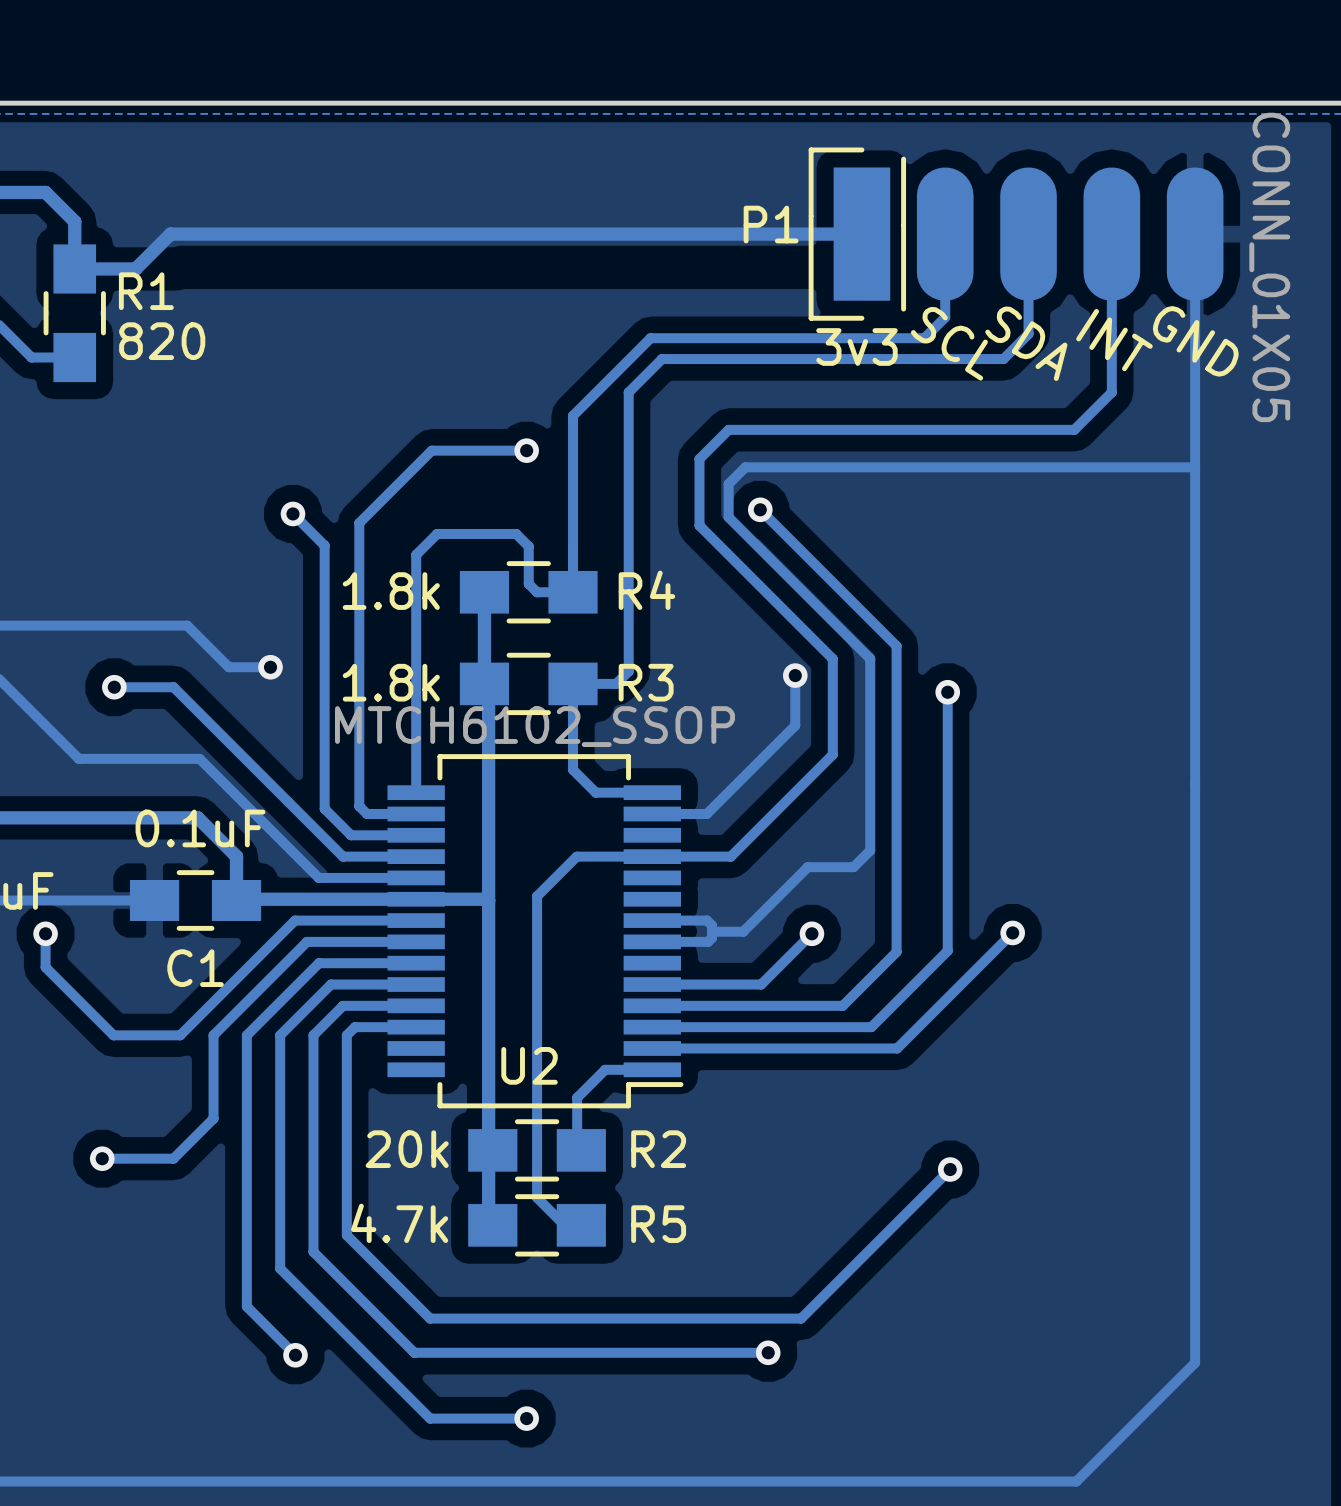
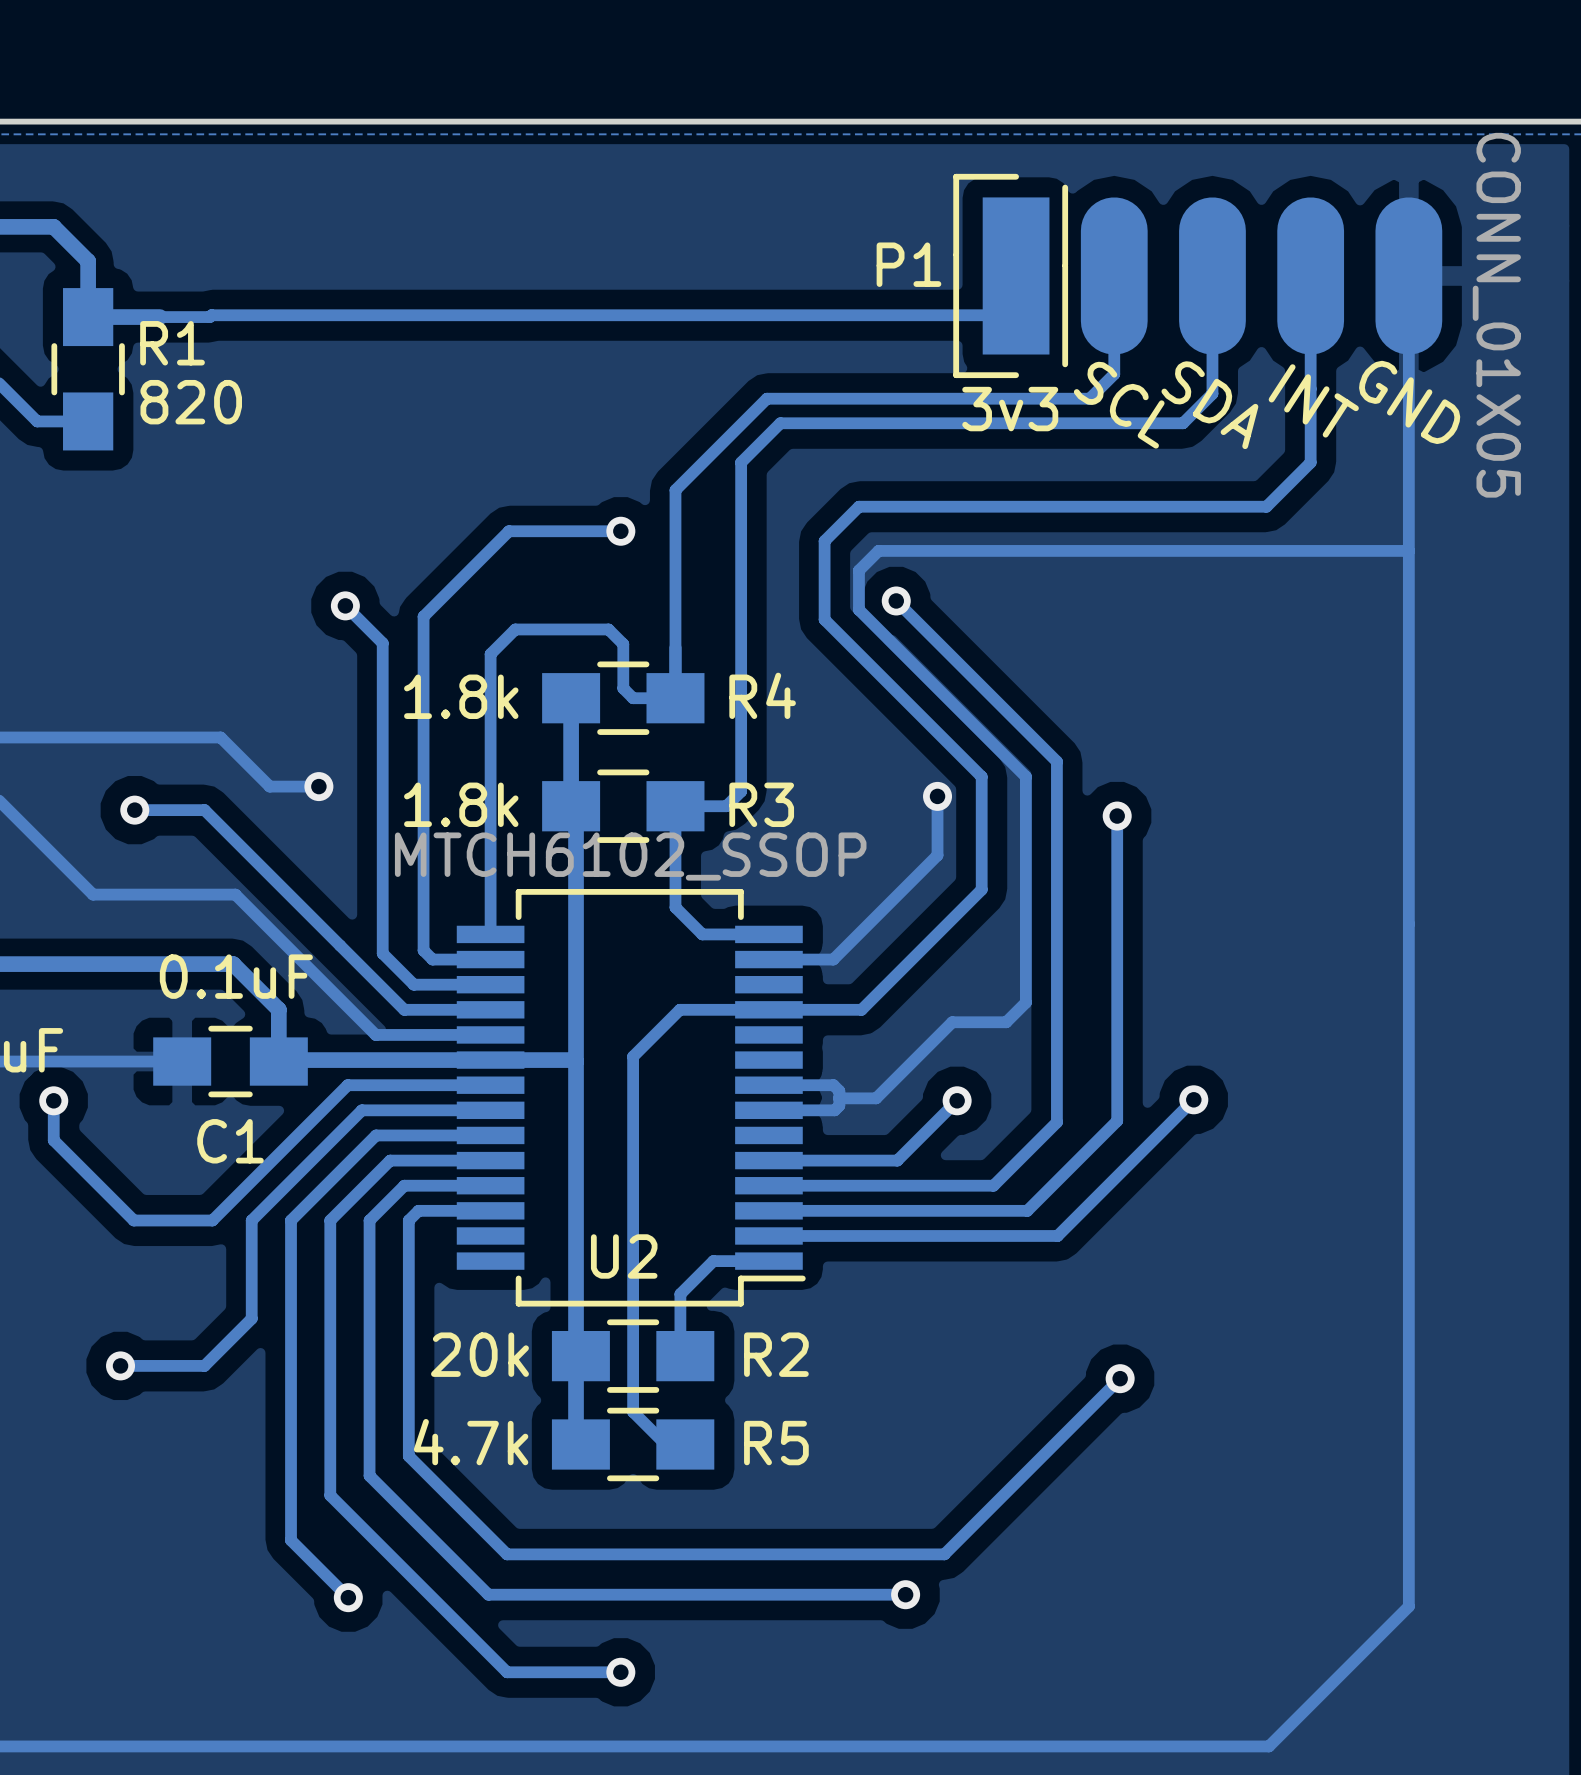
track: (861, 234) (170, 234) (135, 268) -> (1016, 315) (211, 315) (209, 317) (159, 317)

